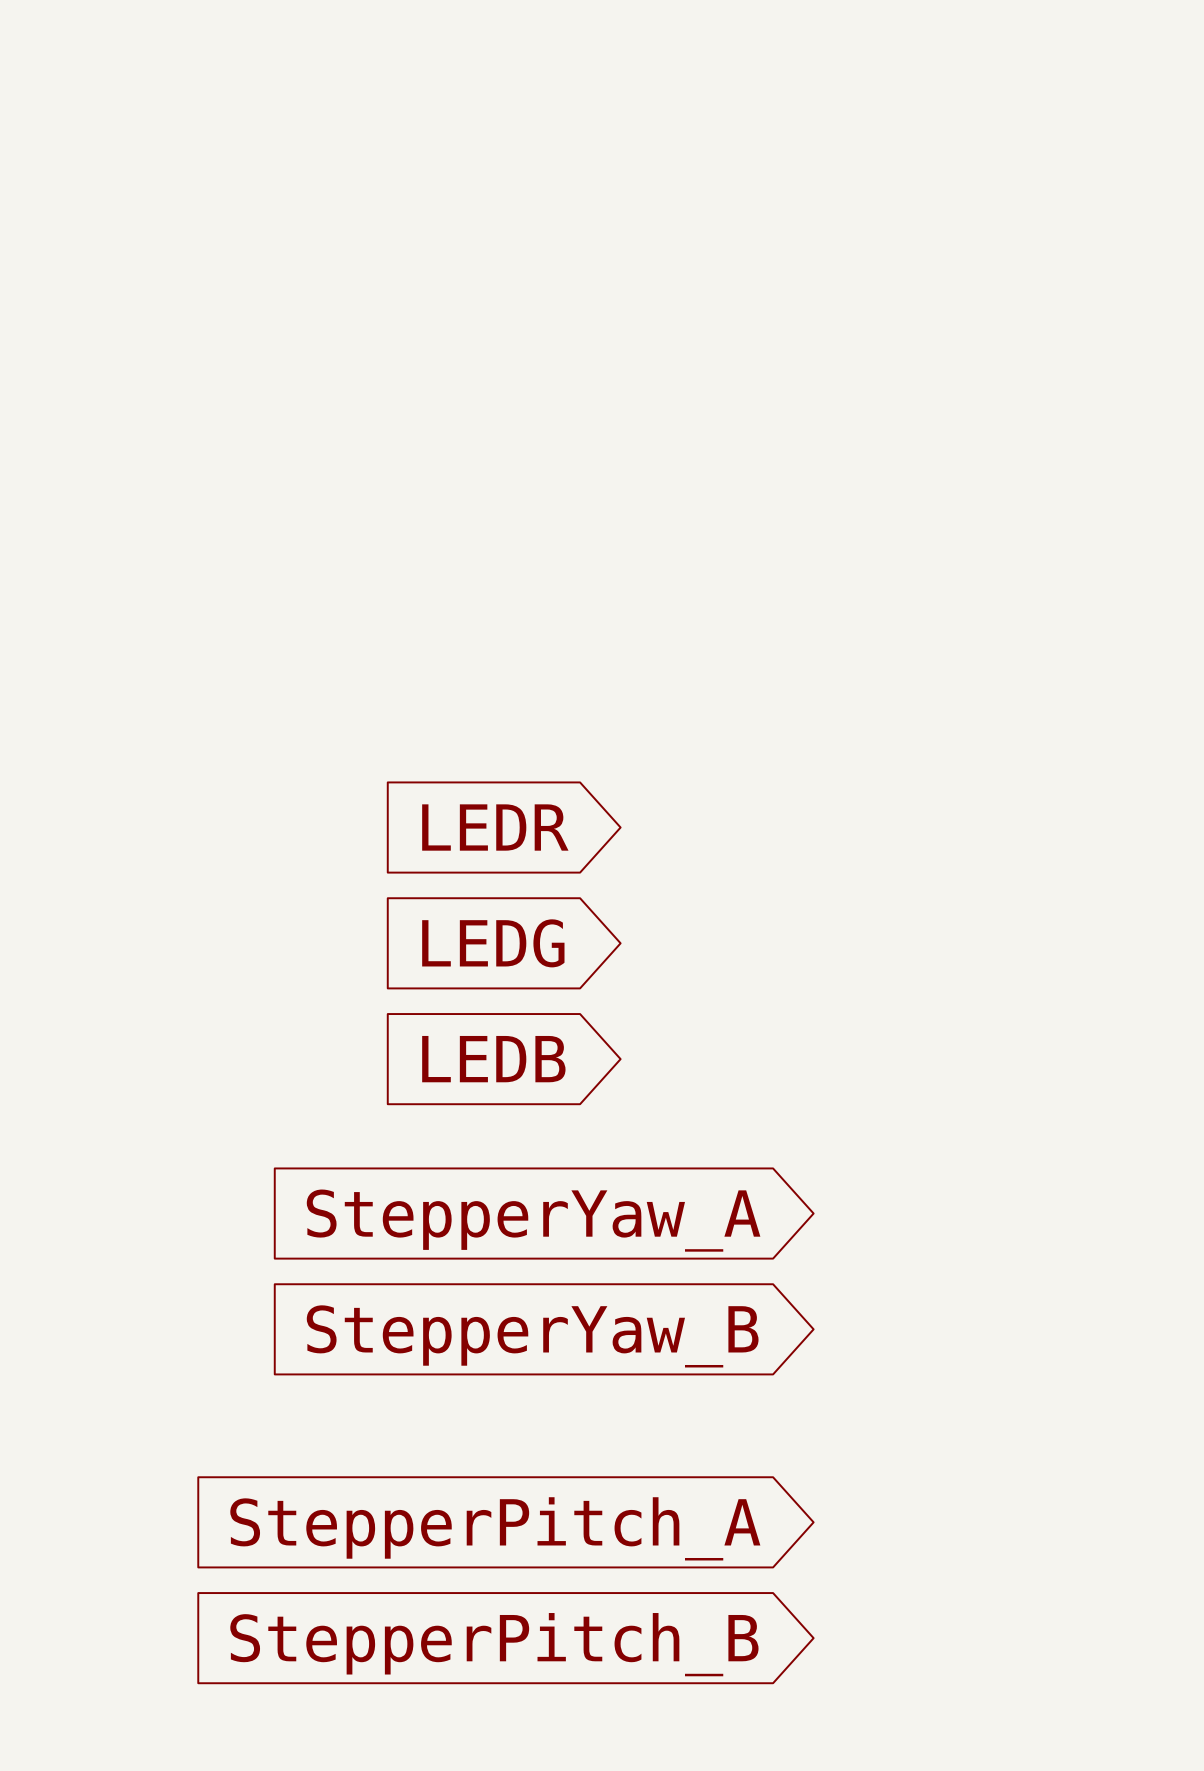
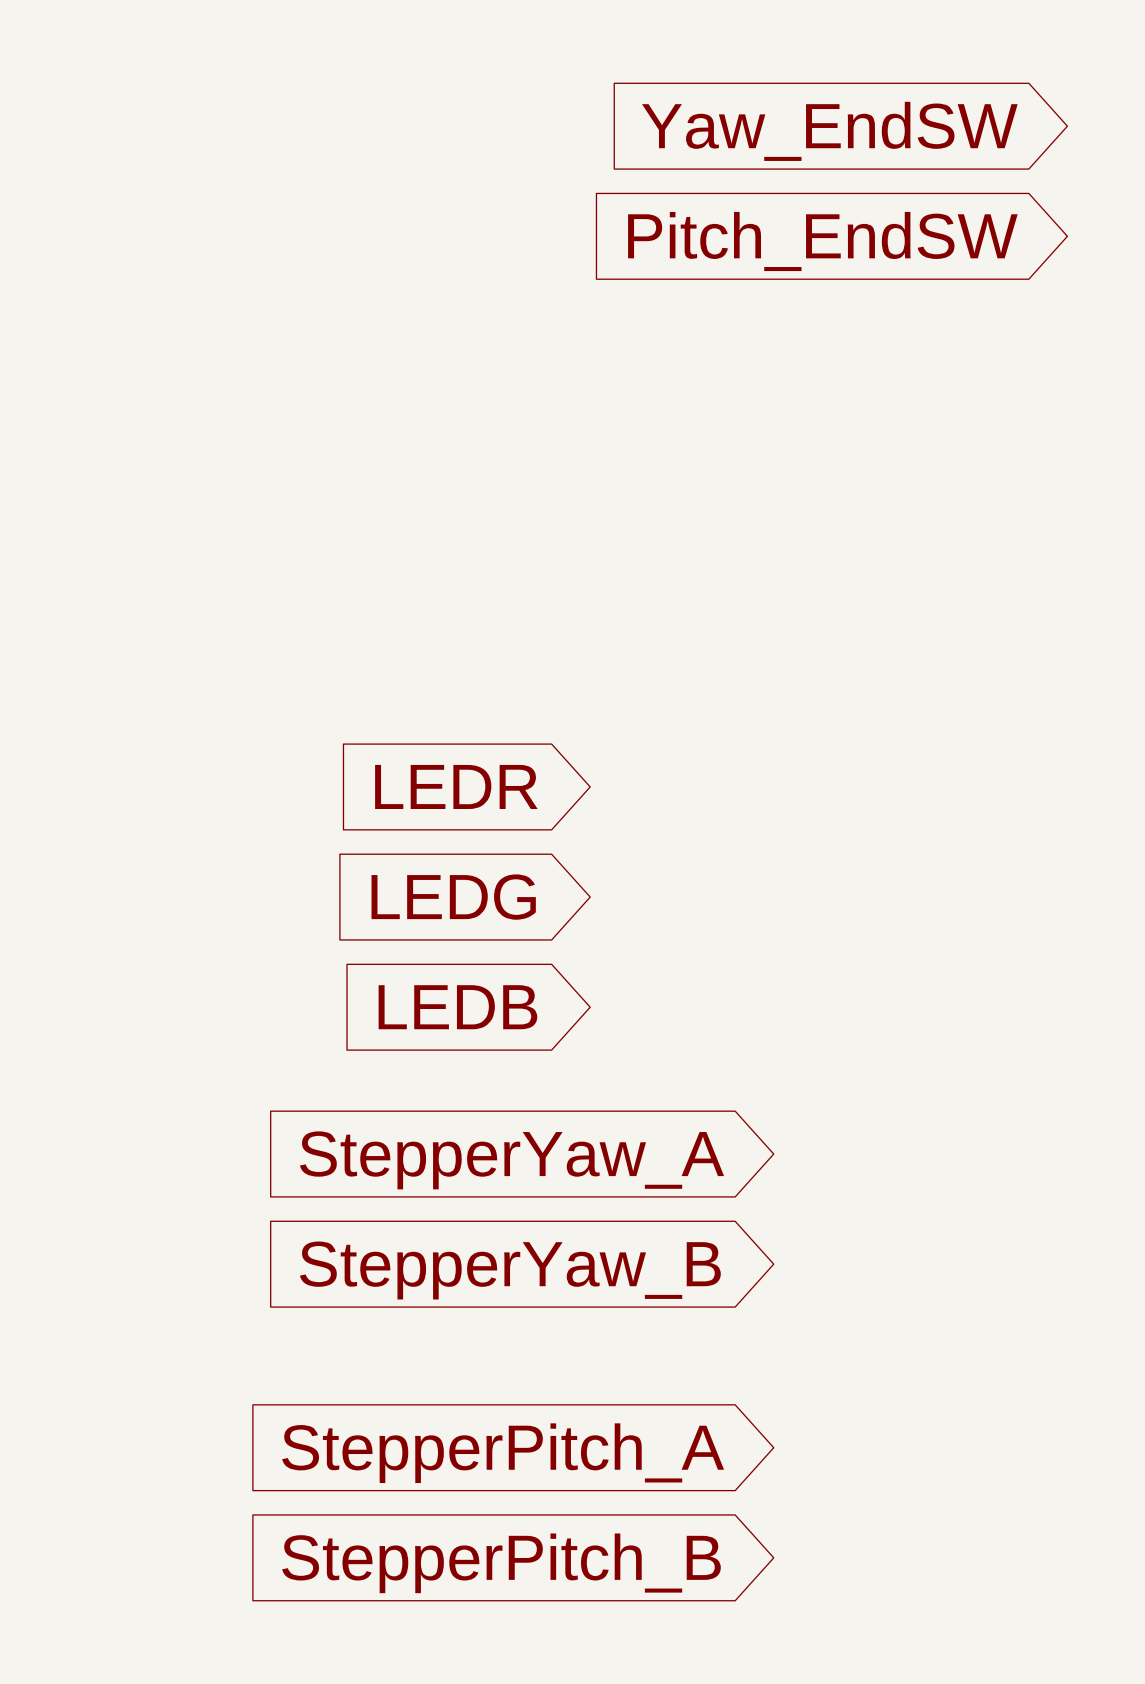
global label: none -> Yaw_EndSW (829, 131)
global label: none -> Pitch_EndSW (822, 241)

